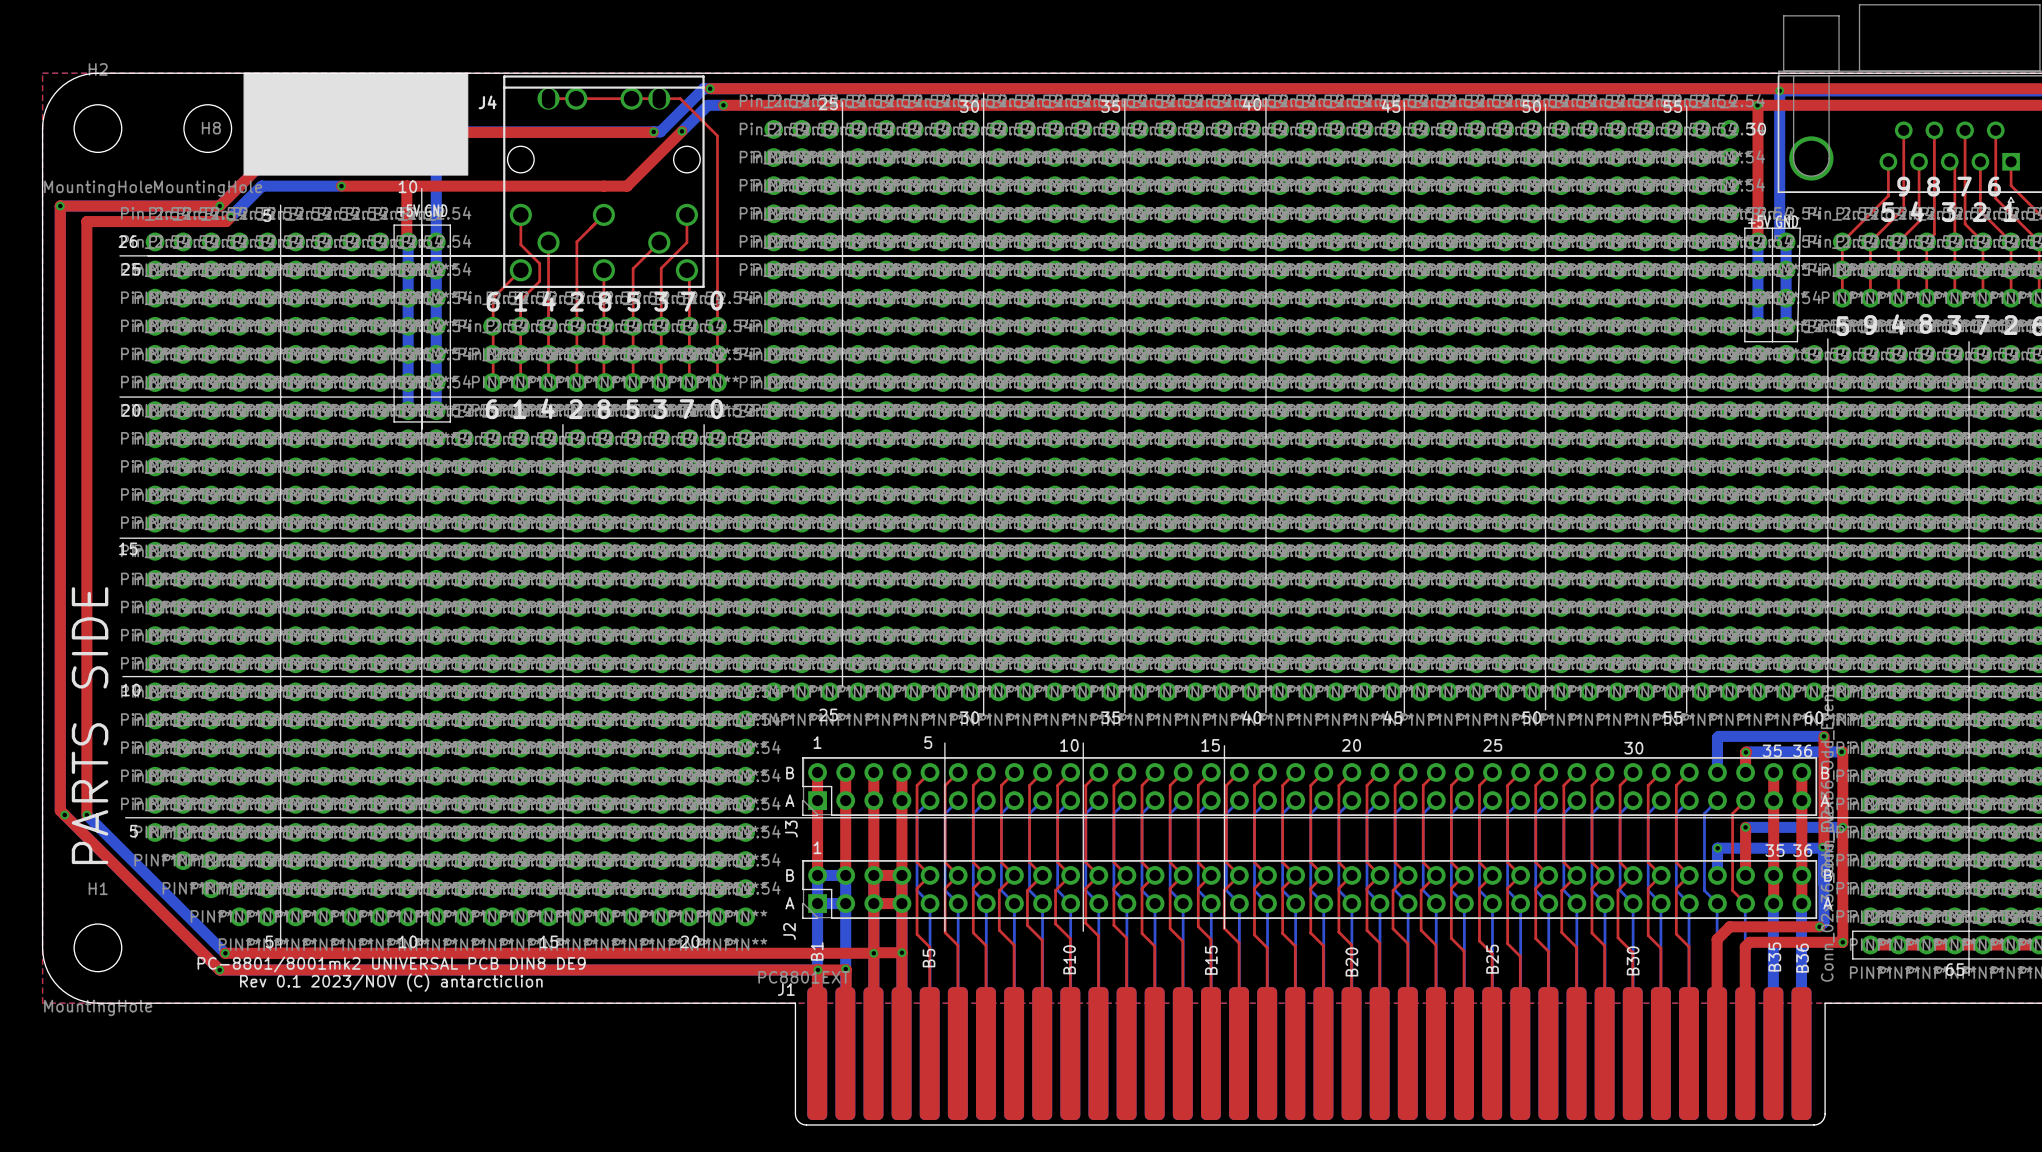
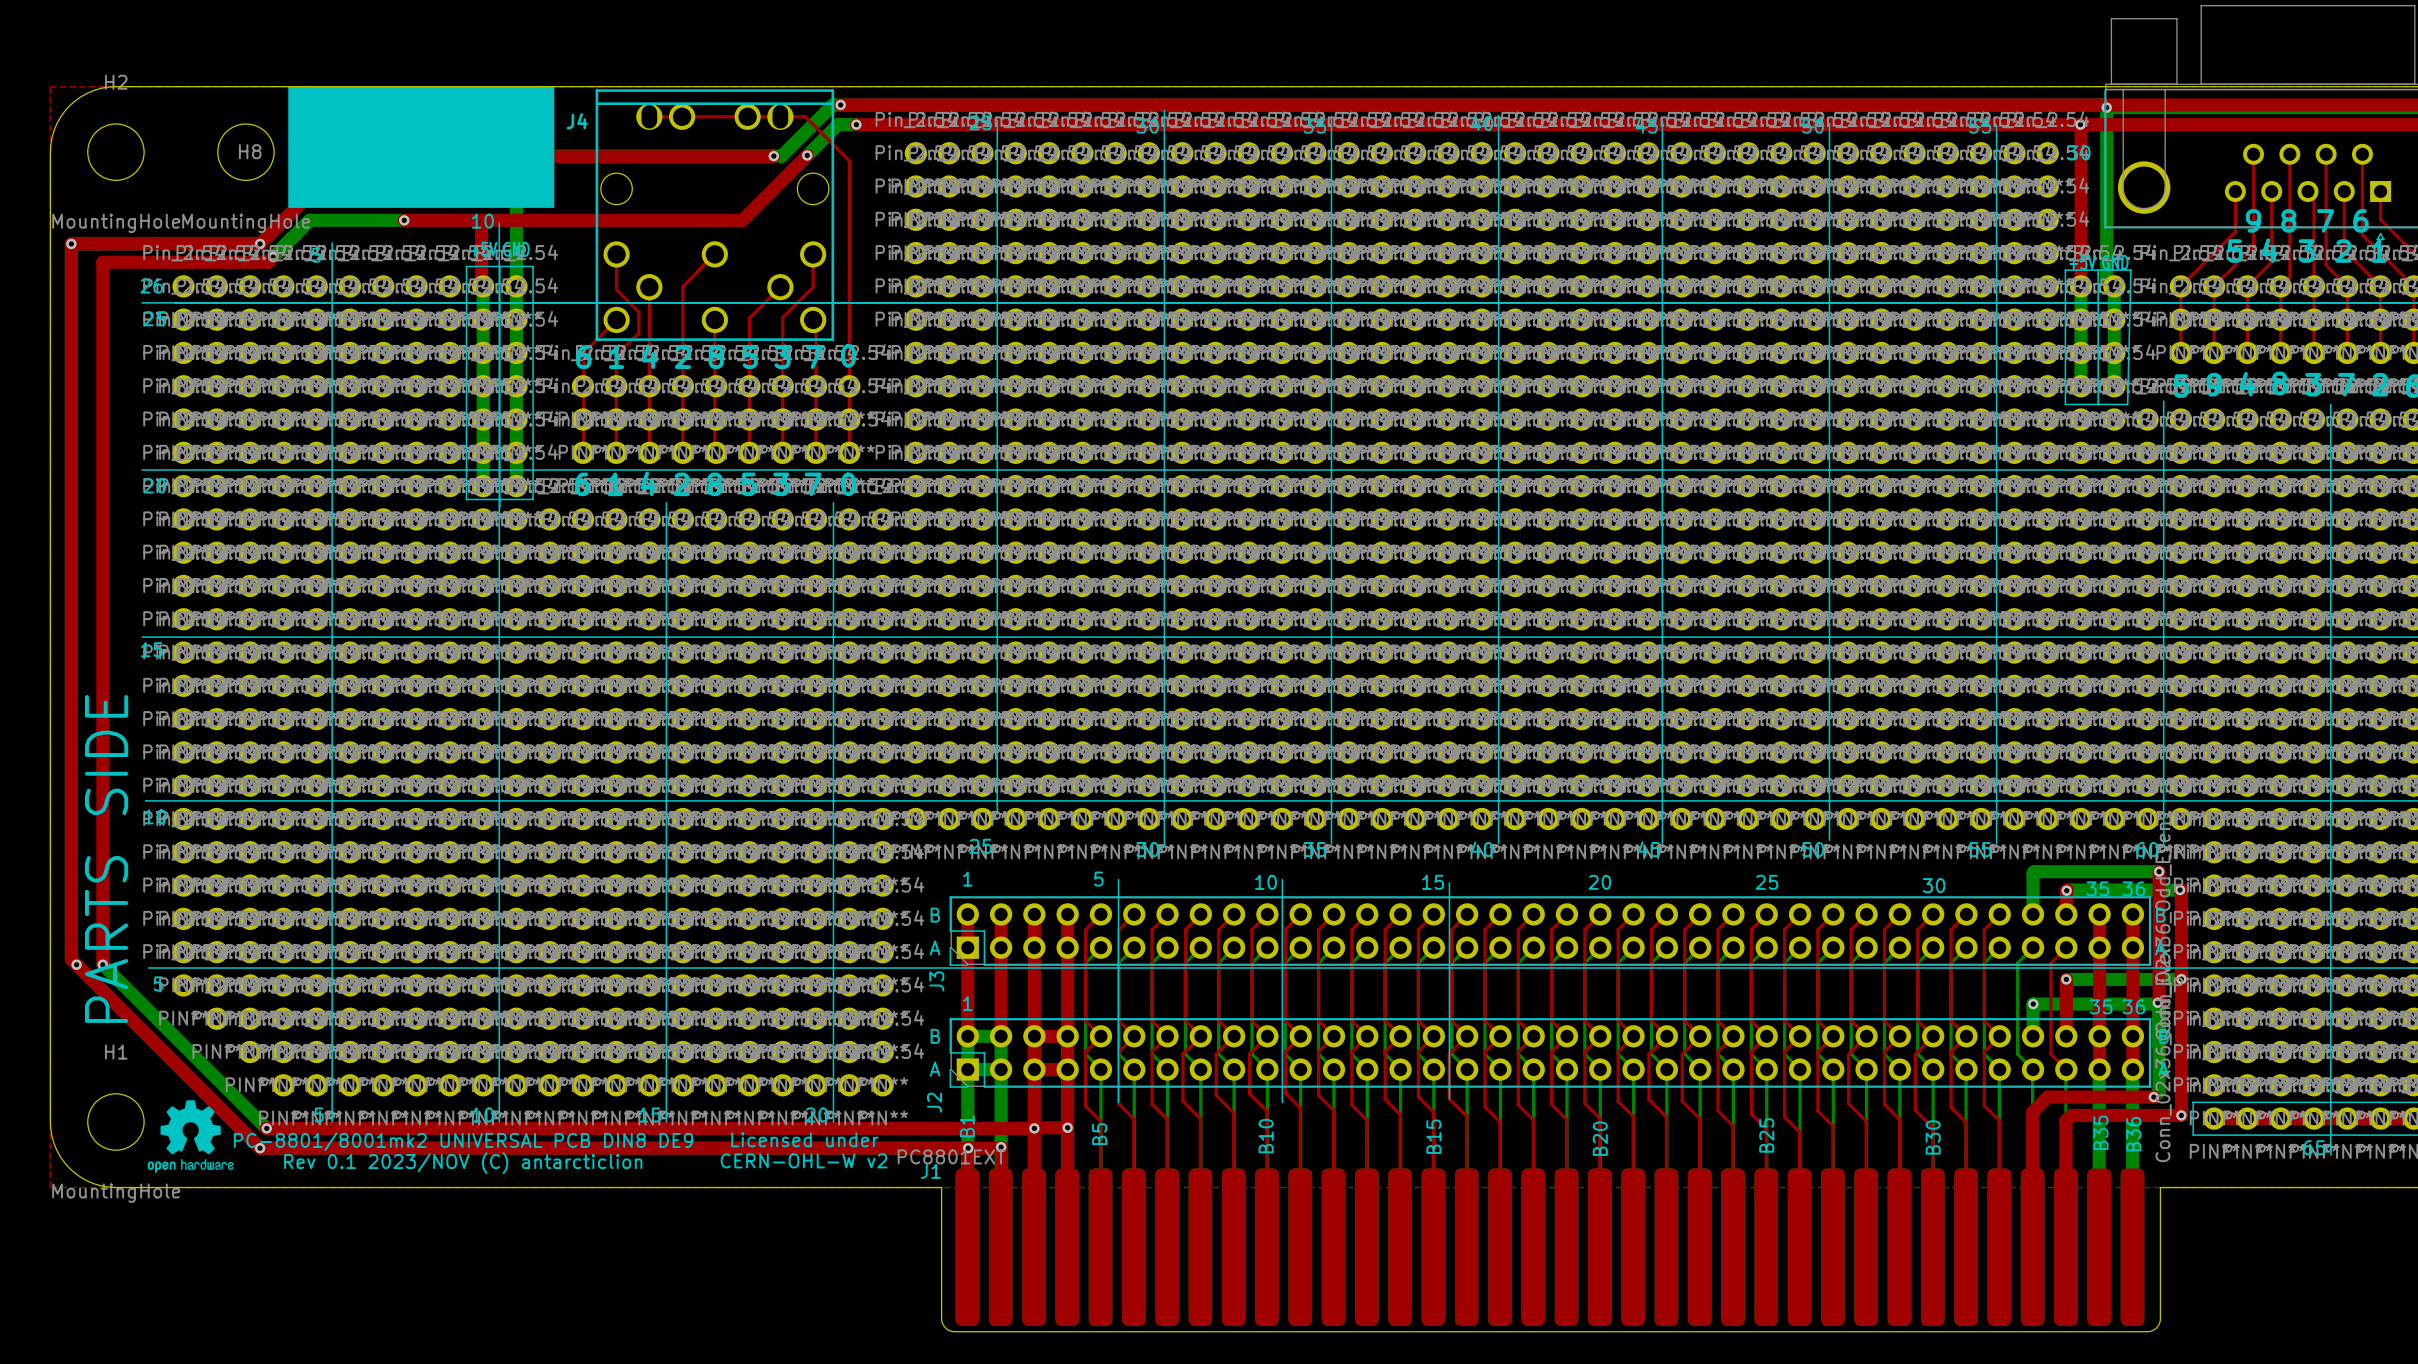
drawing: none -> [147, 1100, 234, 1173]
text: none -> Licensed under (804, 1139)
text: none -> CERN-OHL-W v2 (803, 1160)

